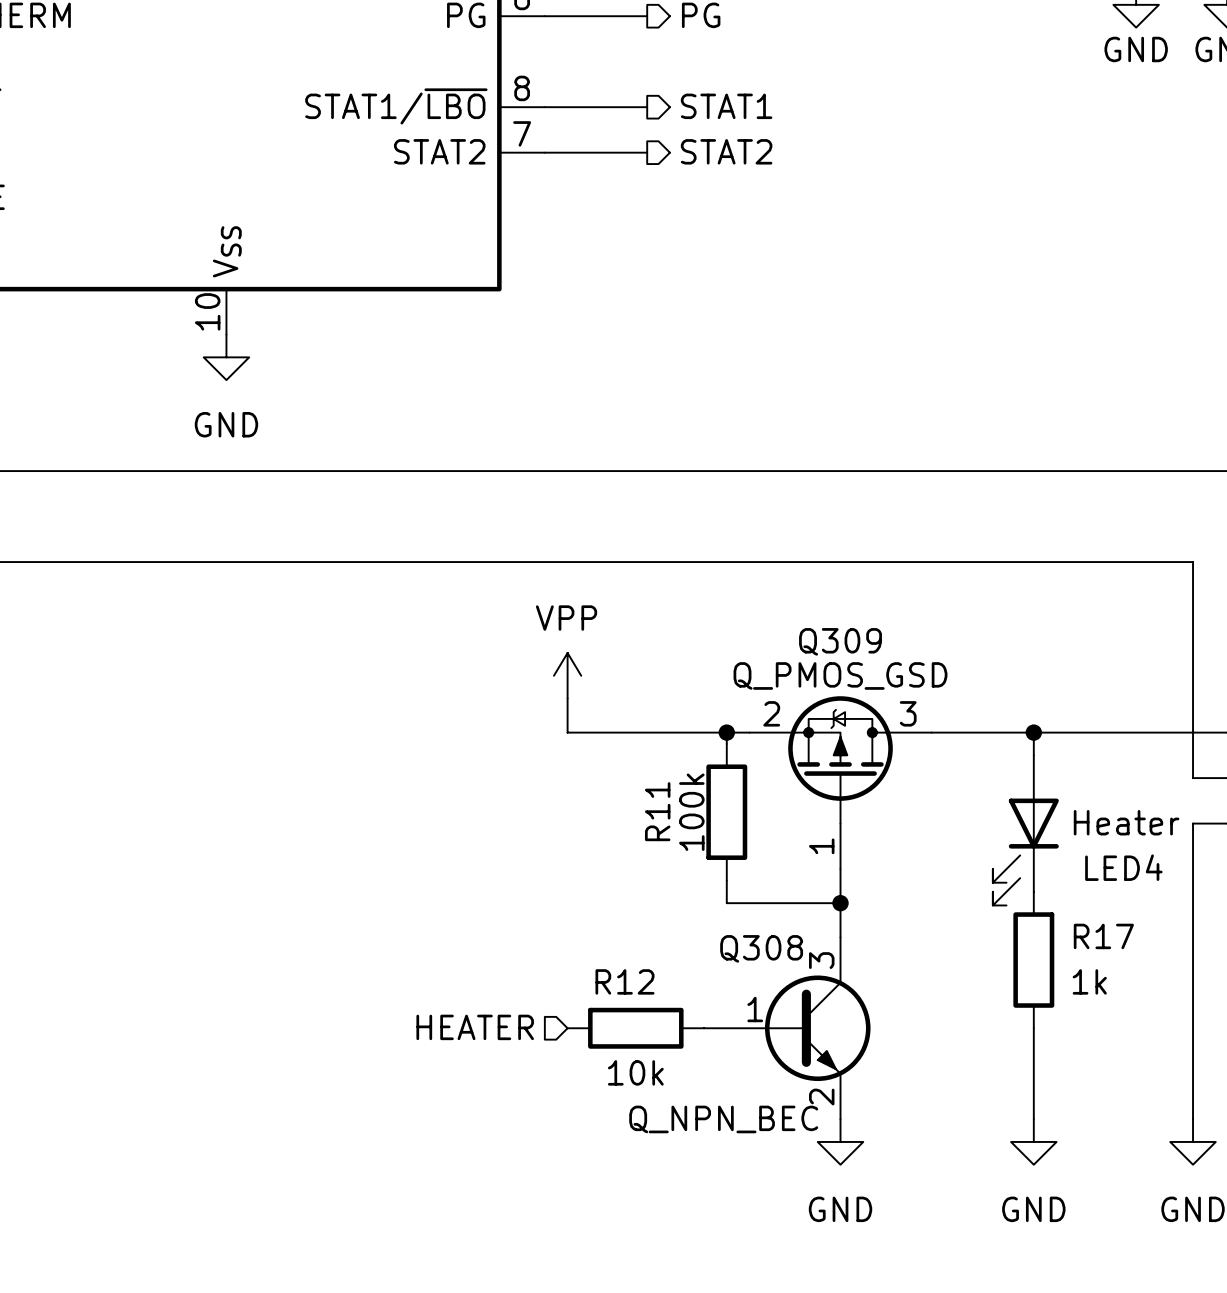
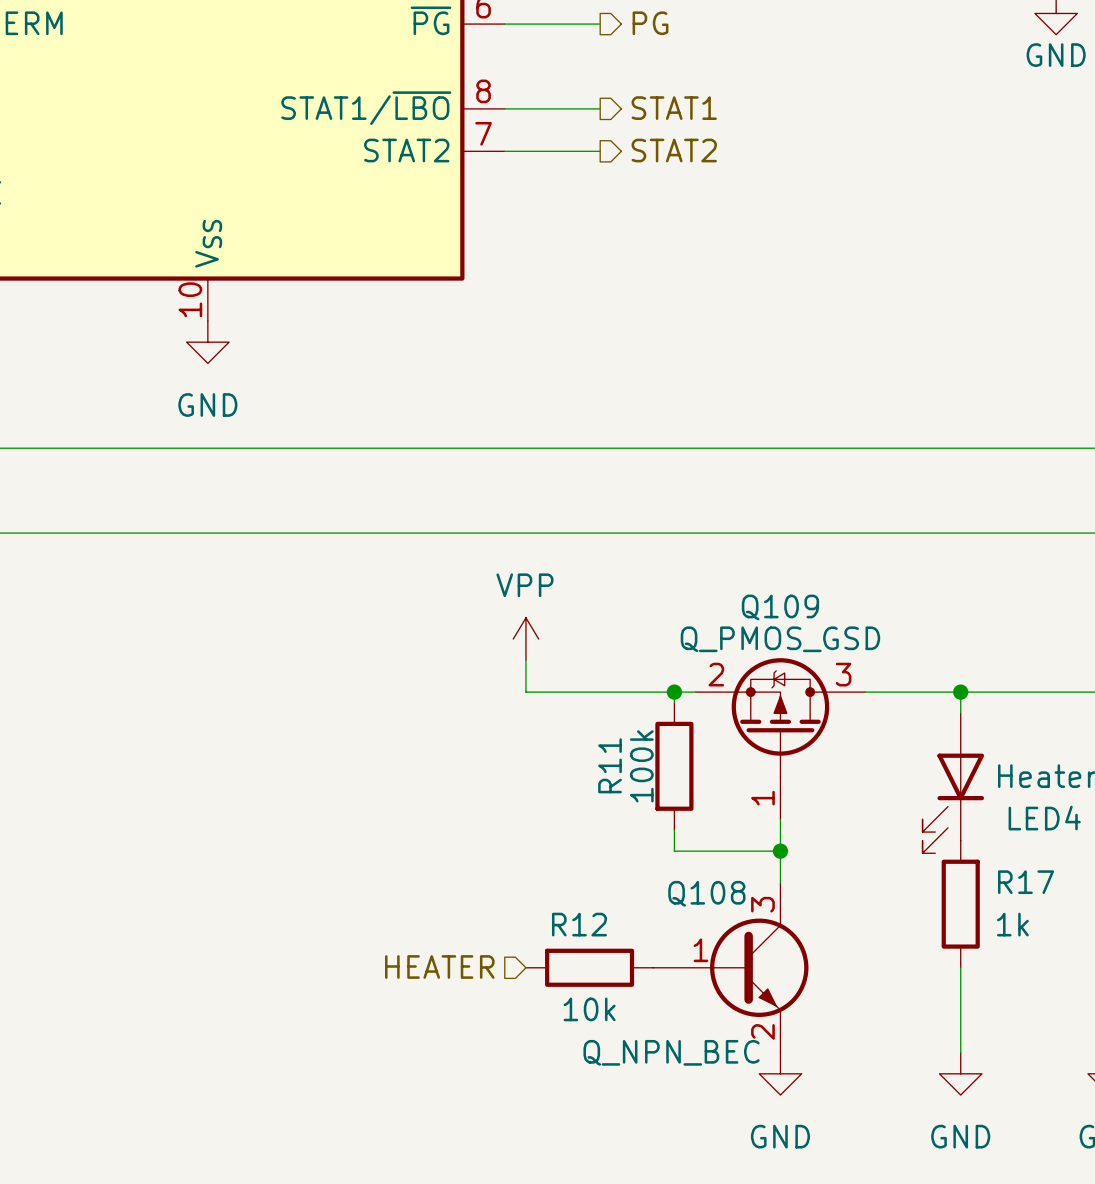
Q309 name: Q309 (840, 641) -> Q109 (780, 607)
Q308 name: Q308 (761, 948) -> Q108 (706, 893)

